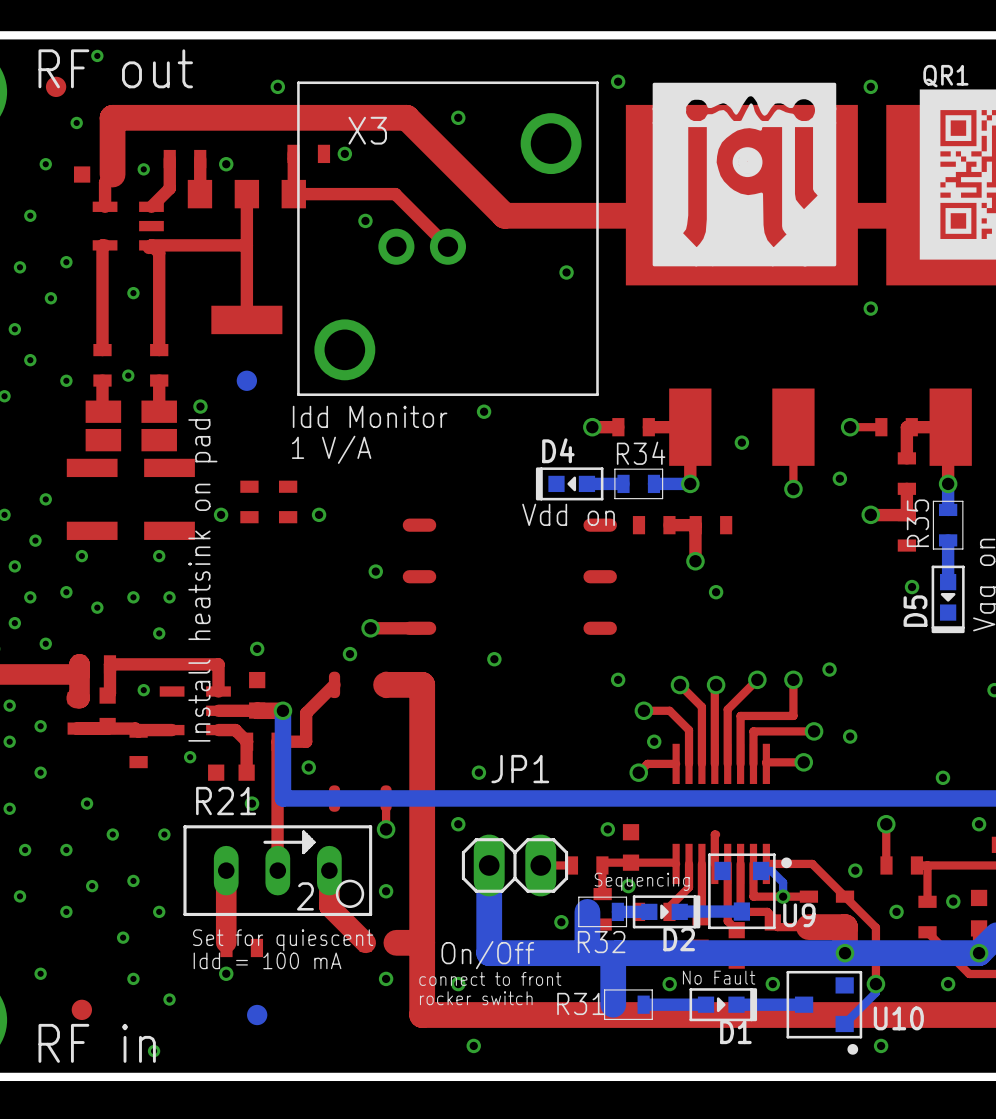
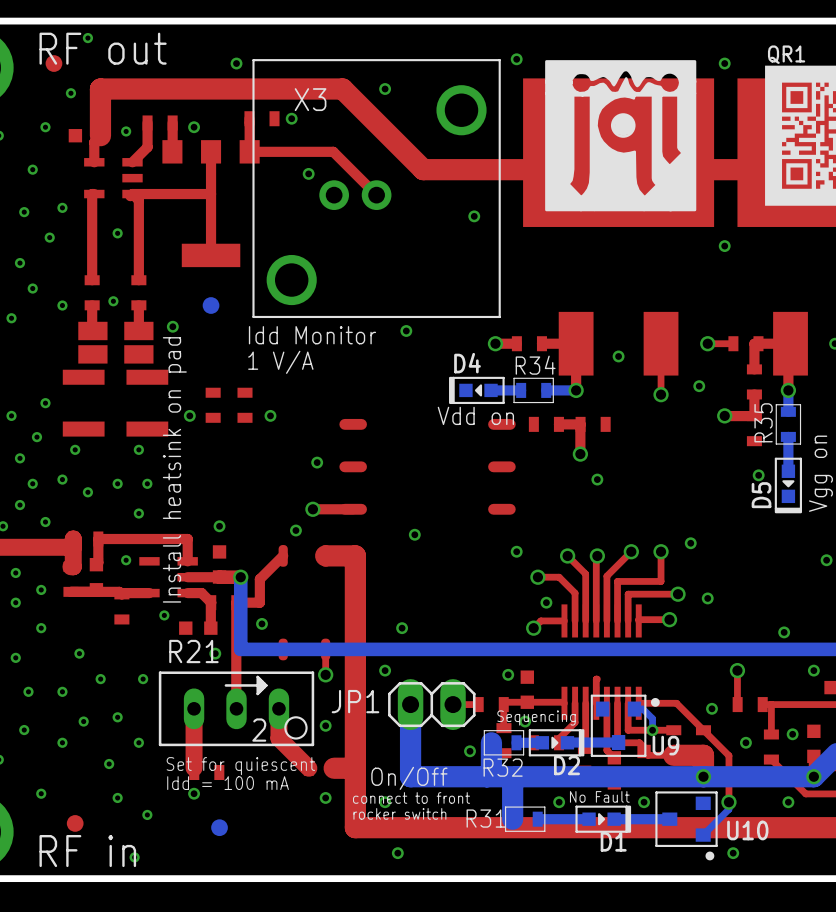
JP1 name position: JP1 (520, 769) -> JP1 (355, 701)

